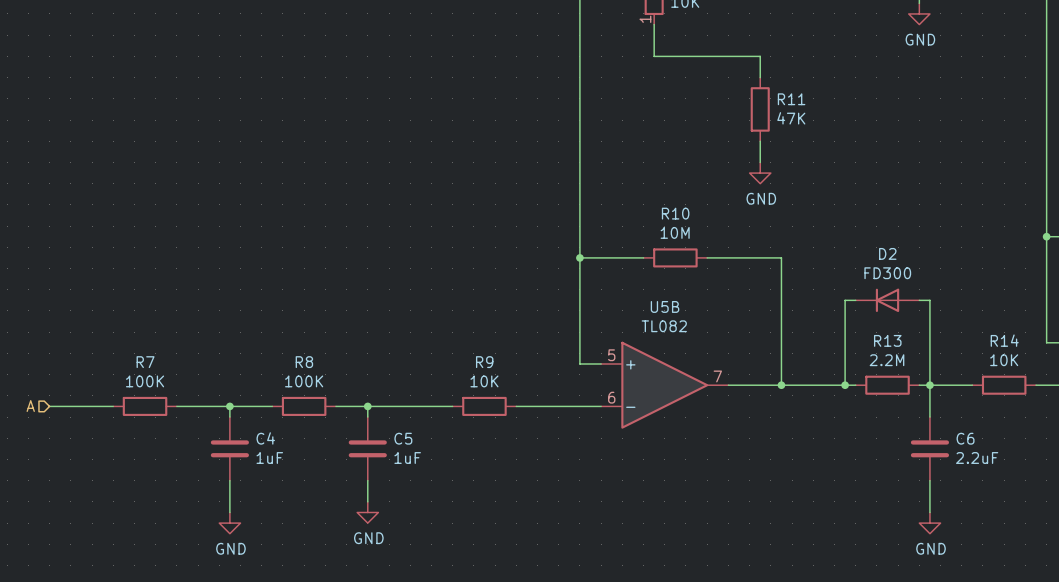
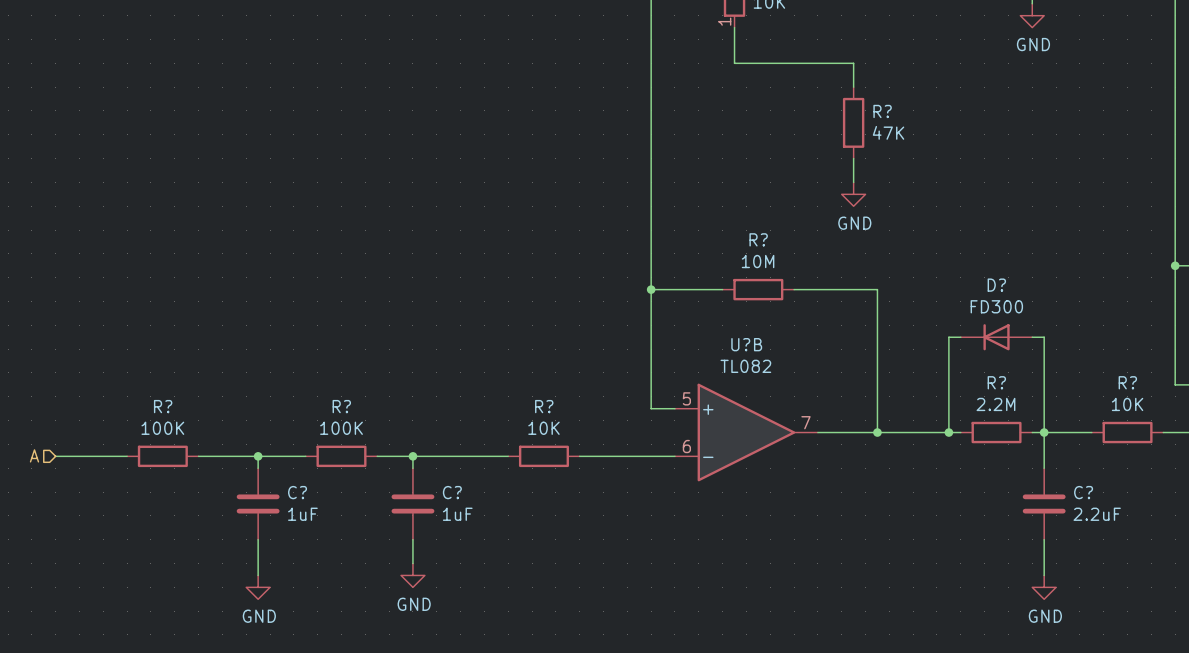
R11 name: R11 (791, 99) -> R? (882, 111)
R10 name: R10 (675, 213) -> R? (758, 239)
D2 name: D2 (887, 253) -> D? (996, 285)
U5B name: U5B (665, 306) -> U?B (746, 344)
R13 name: R13 (887, 340) -> R? (996, 382)
R14 name: R14 (1004, 340) -> R? (1127, 382)
R7 name: R7 (145, 362) -> R? (163, 406)
R8 name: R8 (304, 362) -> R? (341, 406)
R9 name: R9 (484, 362) -> R? (544, 406)
C4 name: C4 (265, 438) -> C? (297, 492)
C5 name: C5 (403, 438) -> C? (452, 492)
C6 name: C6 (965, 438) -> C? (1083, 492)

